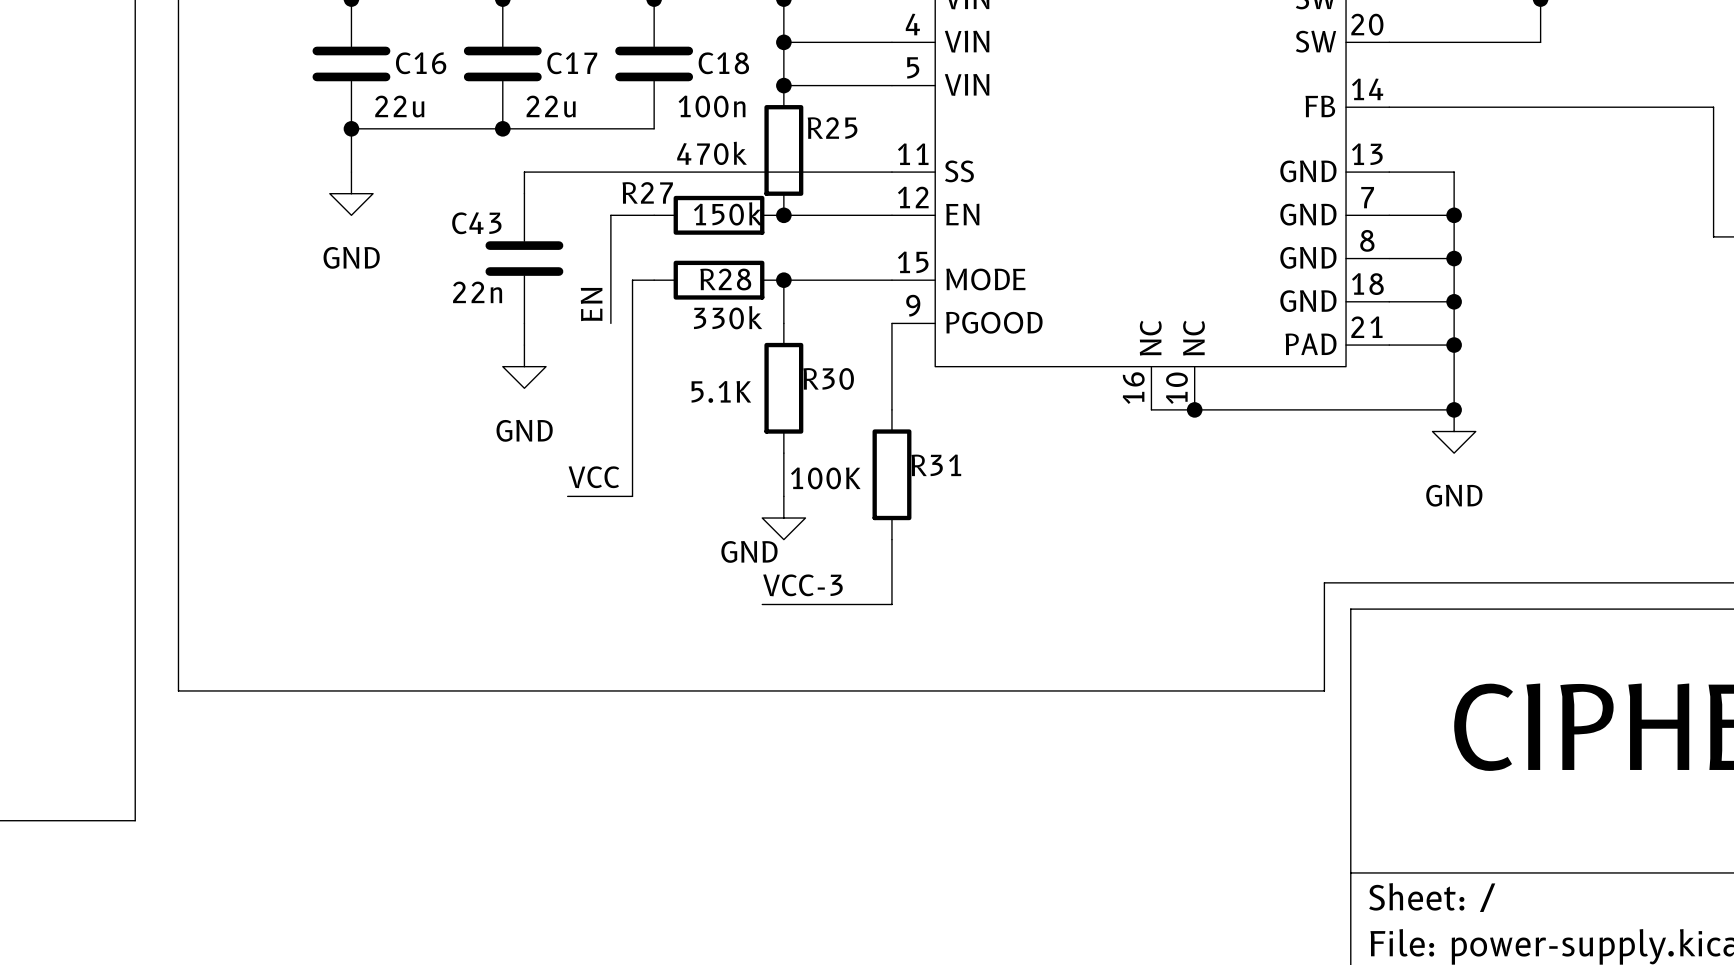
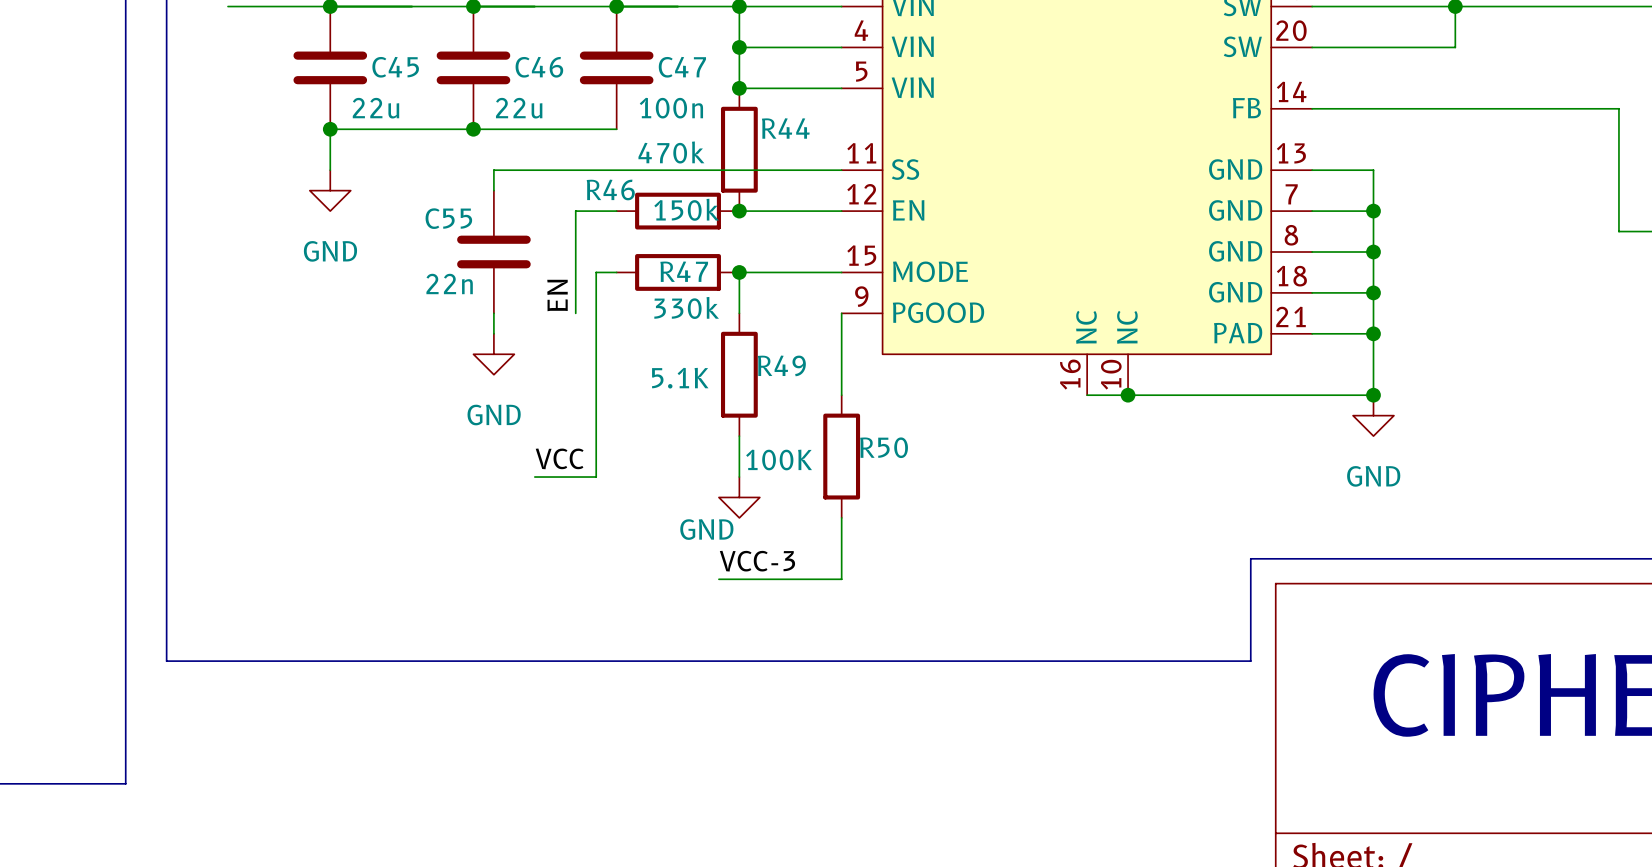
C16 name: C16 (421, 63) -> C45 (395, 67)
C17 name: C17 (572, 63) -> C46 (539, 67)
C18 name: C18 (723, 63) -> C47 (682, 67)
R25 name: R25 (832, 128) -> R44 (785, 128)
R27 name: R27 (647, 192) -> R46 (610, 189)
C43 name: C43 (476, 223) -> C55 (448, 218)
R28 name: R28 (725, 279) -> R47 (684, 271)
R30 name: R30 (828, 378) -> R49 (781, 365)
R31 name: R31 (936, 465) -> R50 (884, 447)

